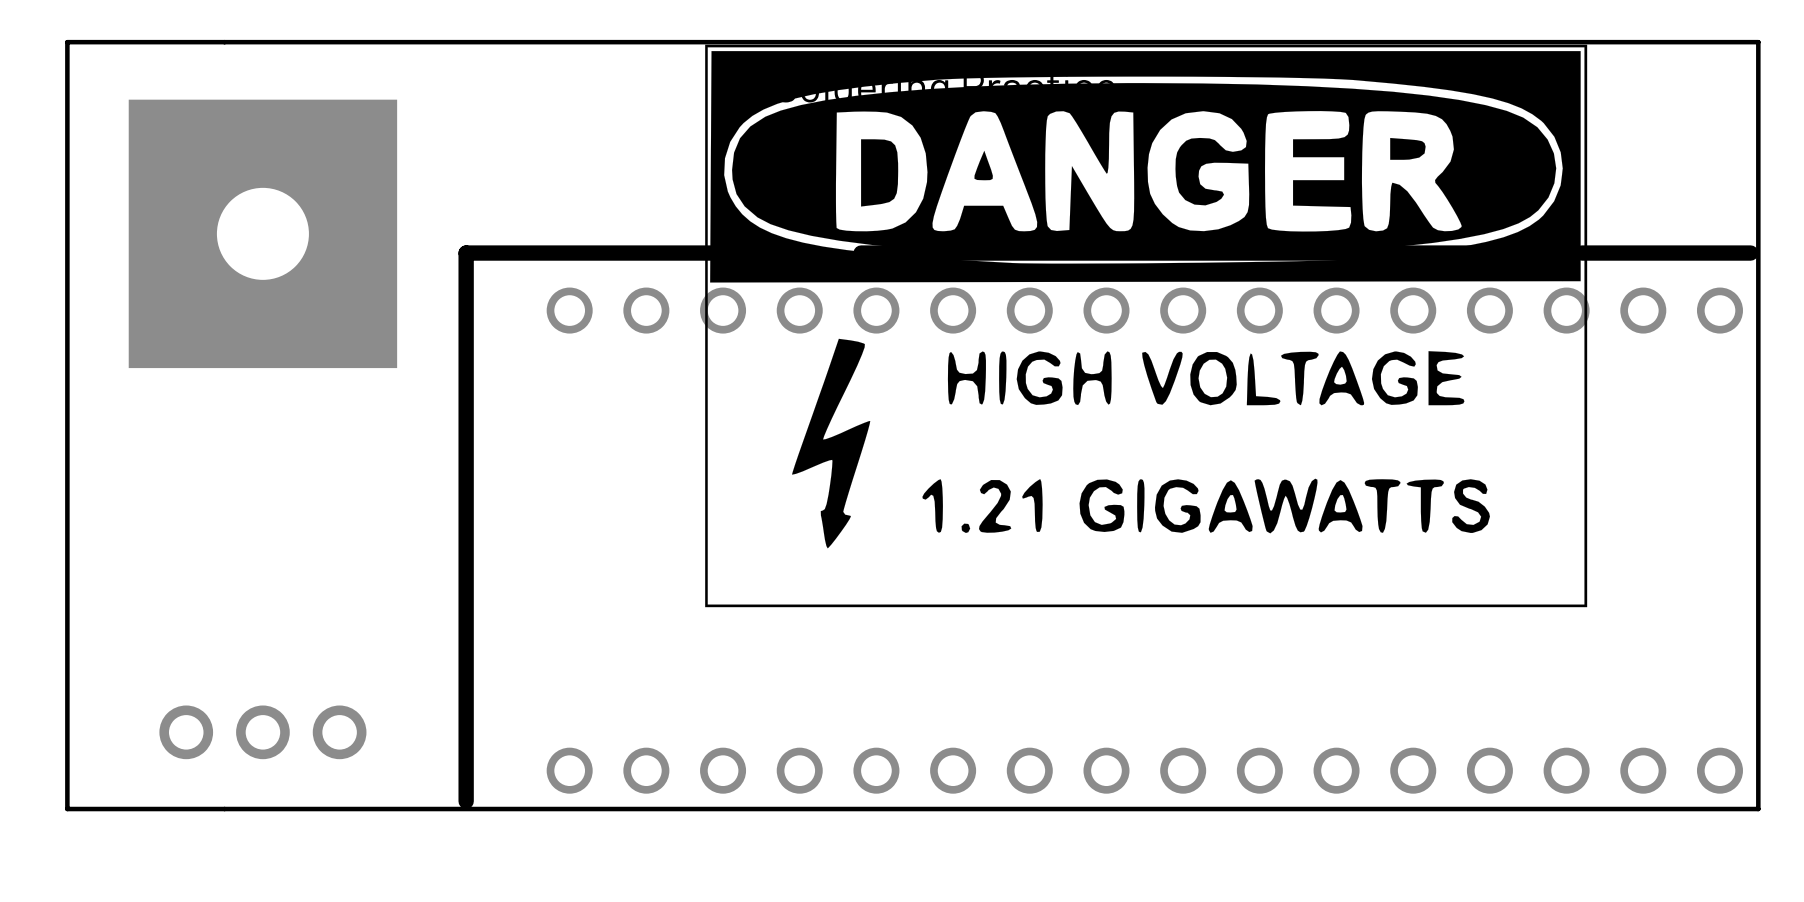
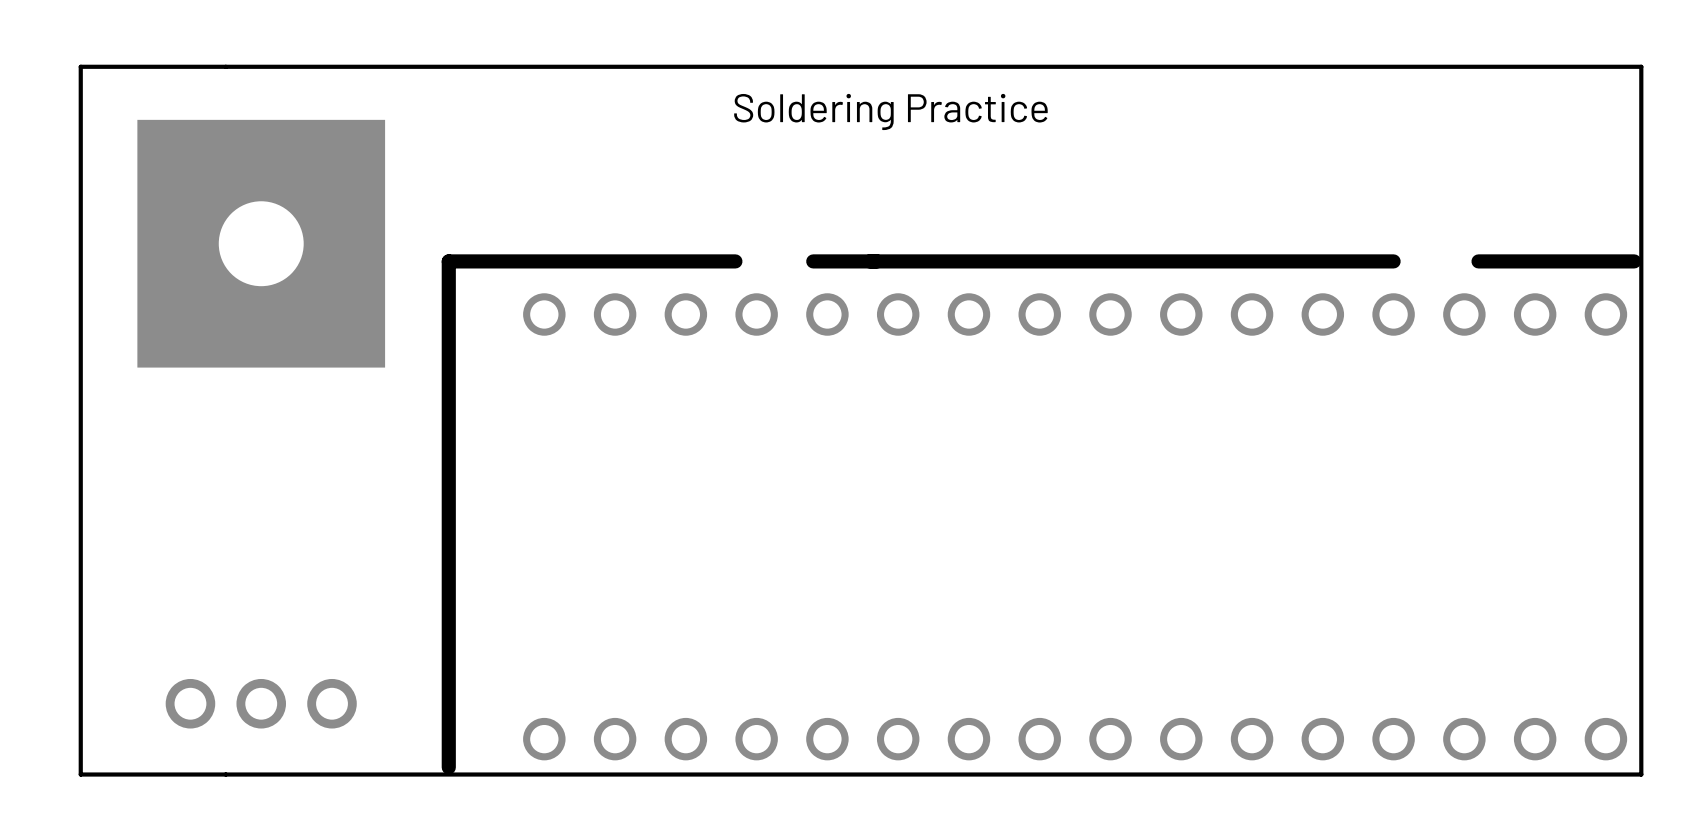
drawing: [705, 44, 1588, 608] -> none

